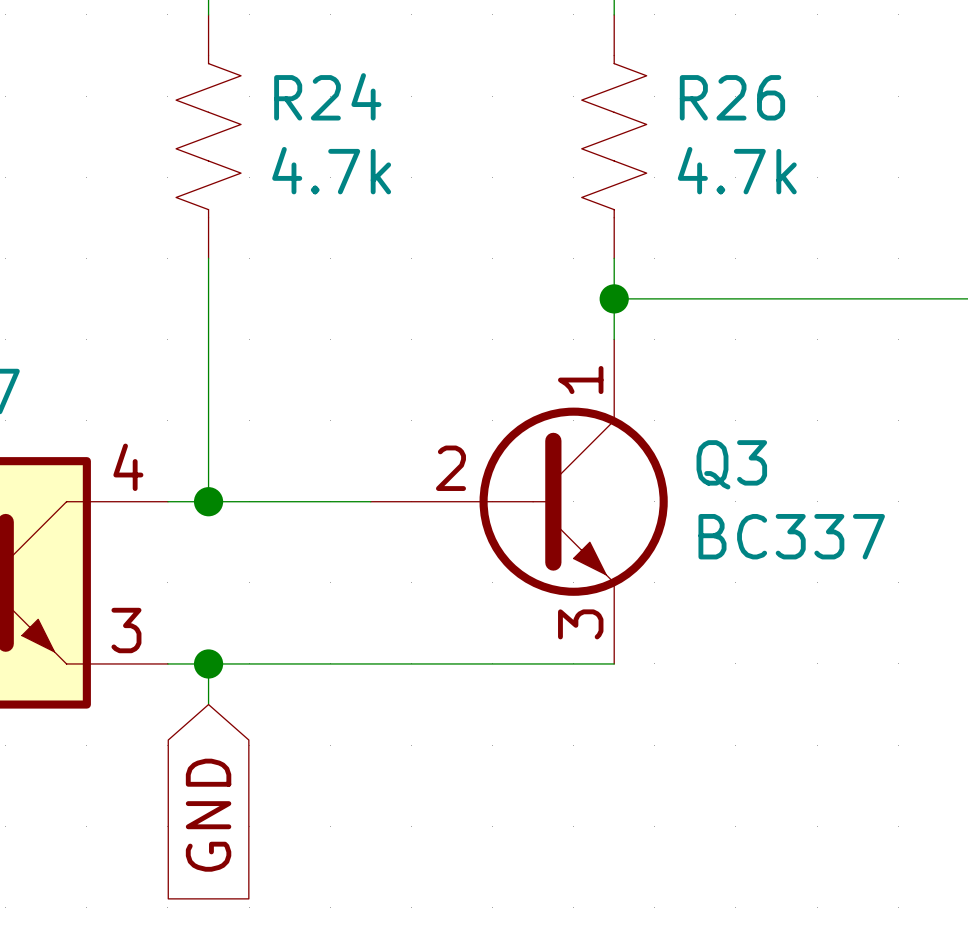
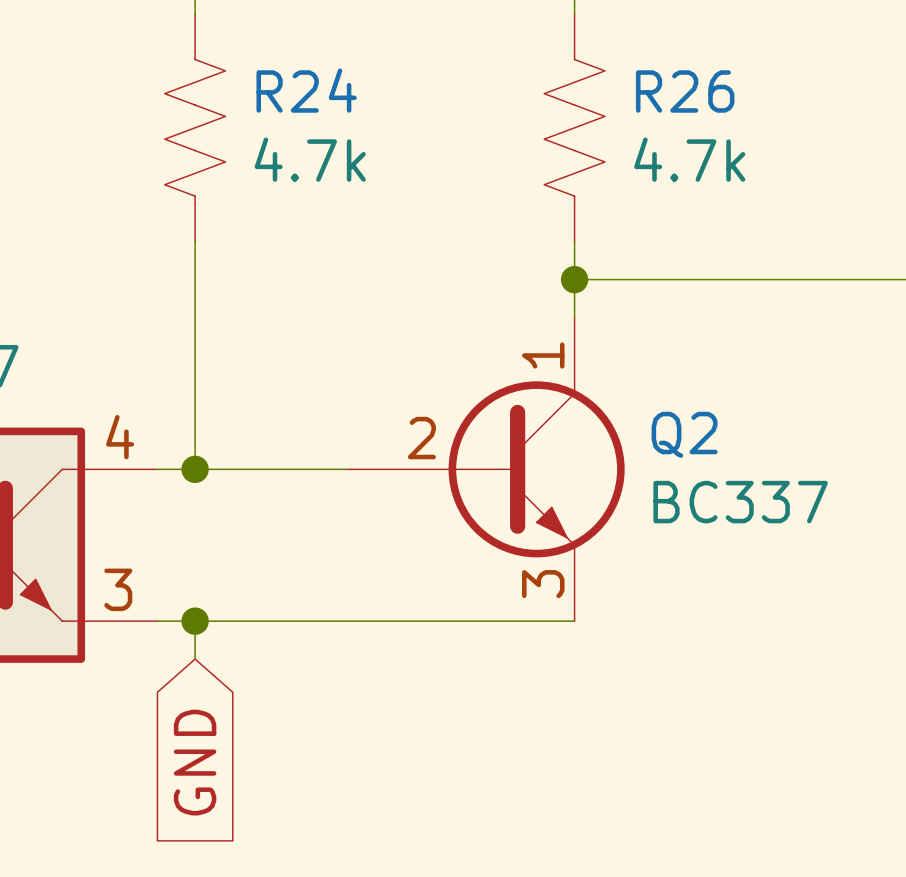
Q3 name: Q3 (731, 464) -> Q2 (684, 434)

